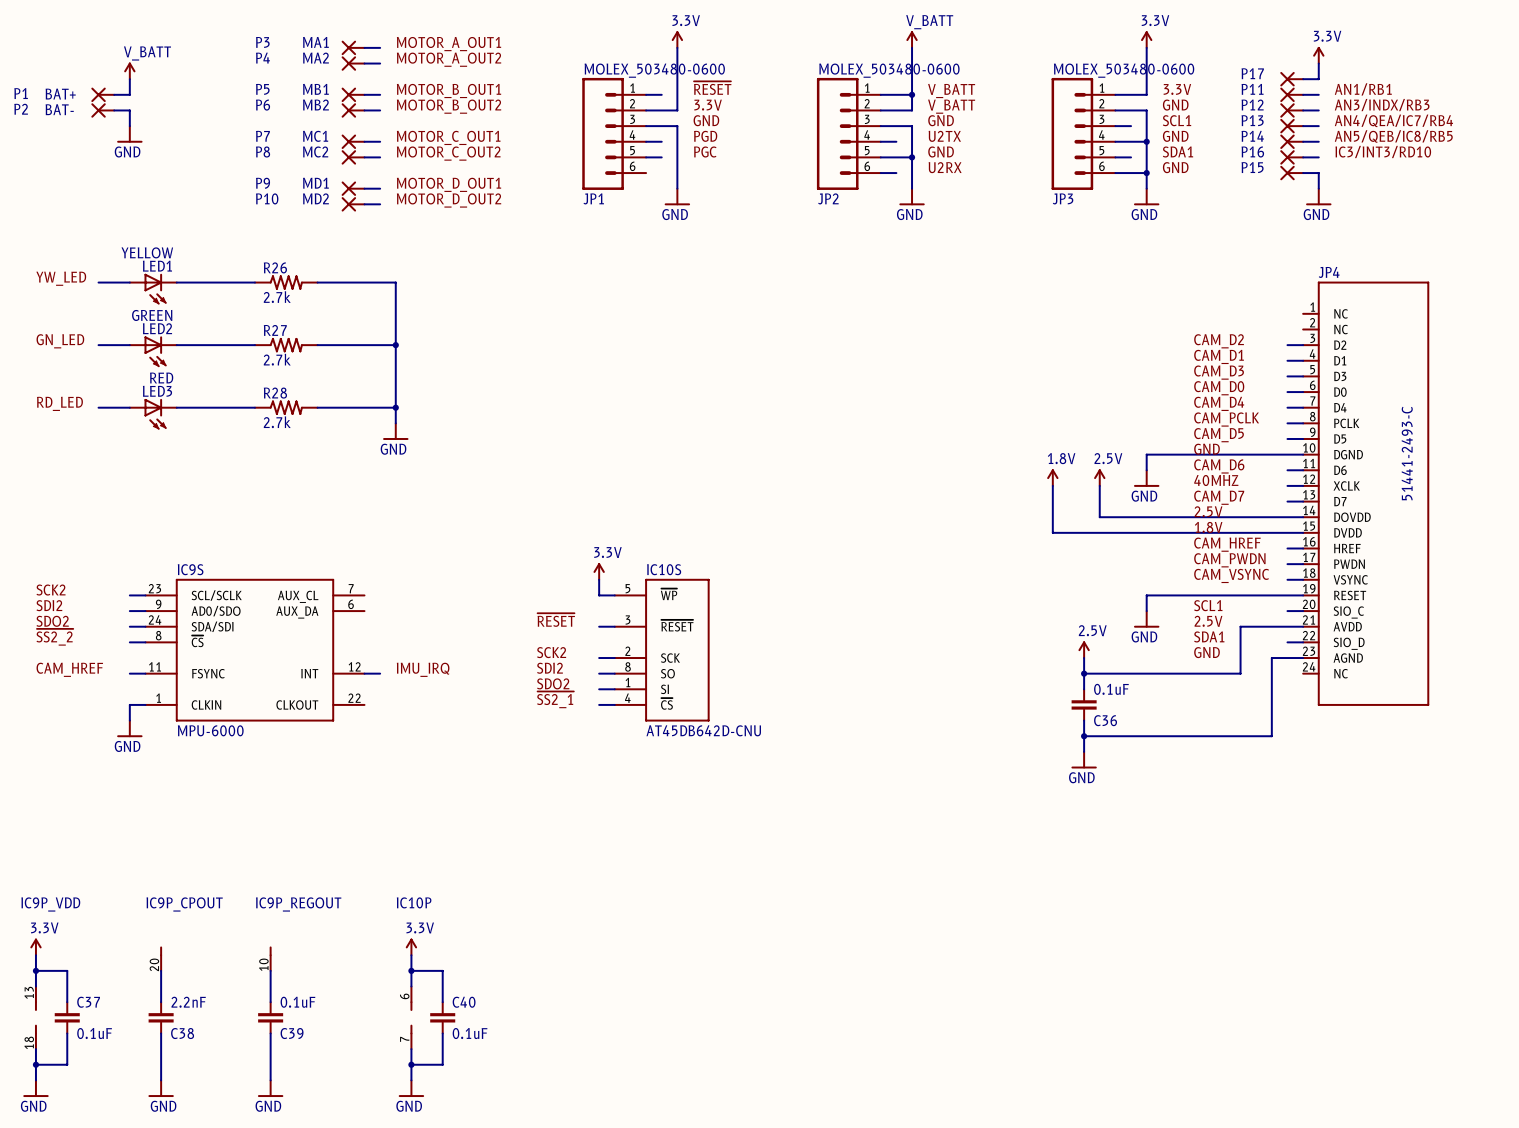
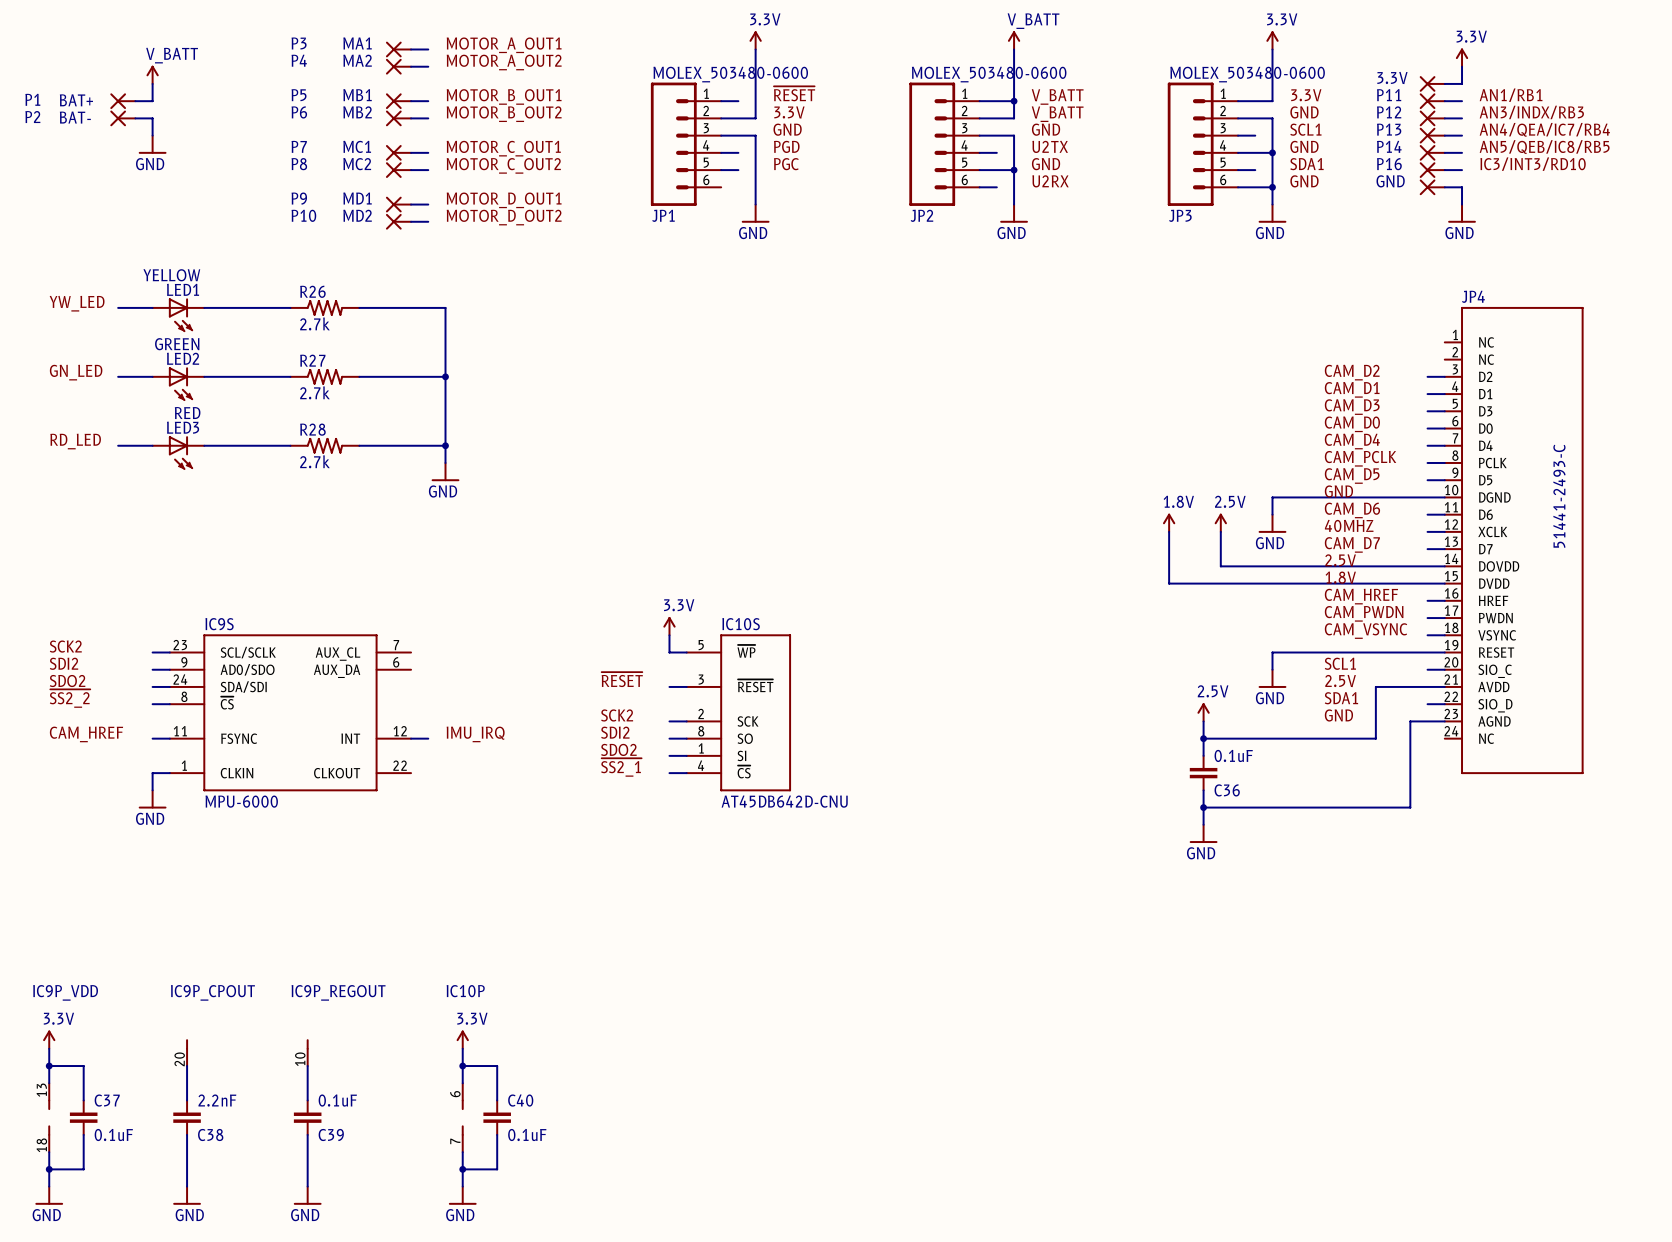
P17 name: P17 (1252, 73) -> 3.3V (1392, 77)
P15 name: P15 (1252, 167) -> GND (1390, 181)

